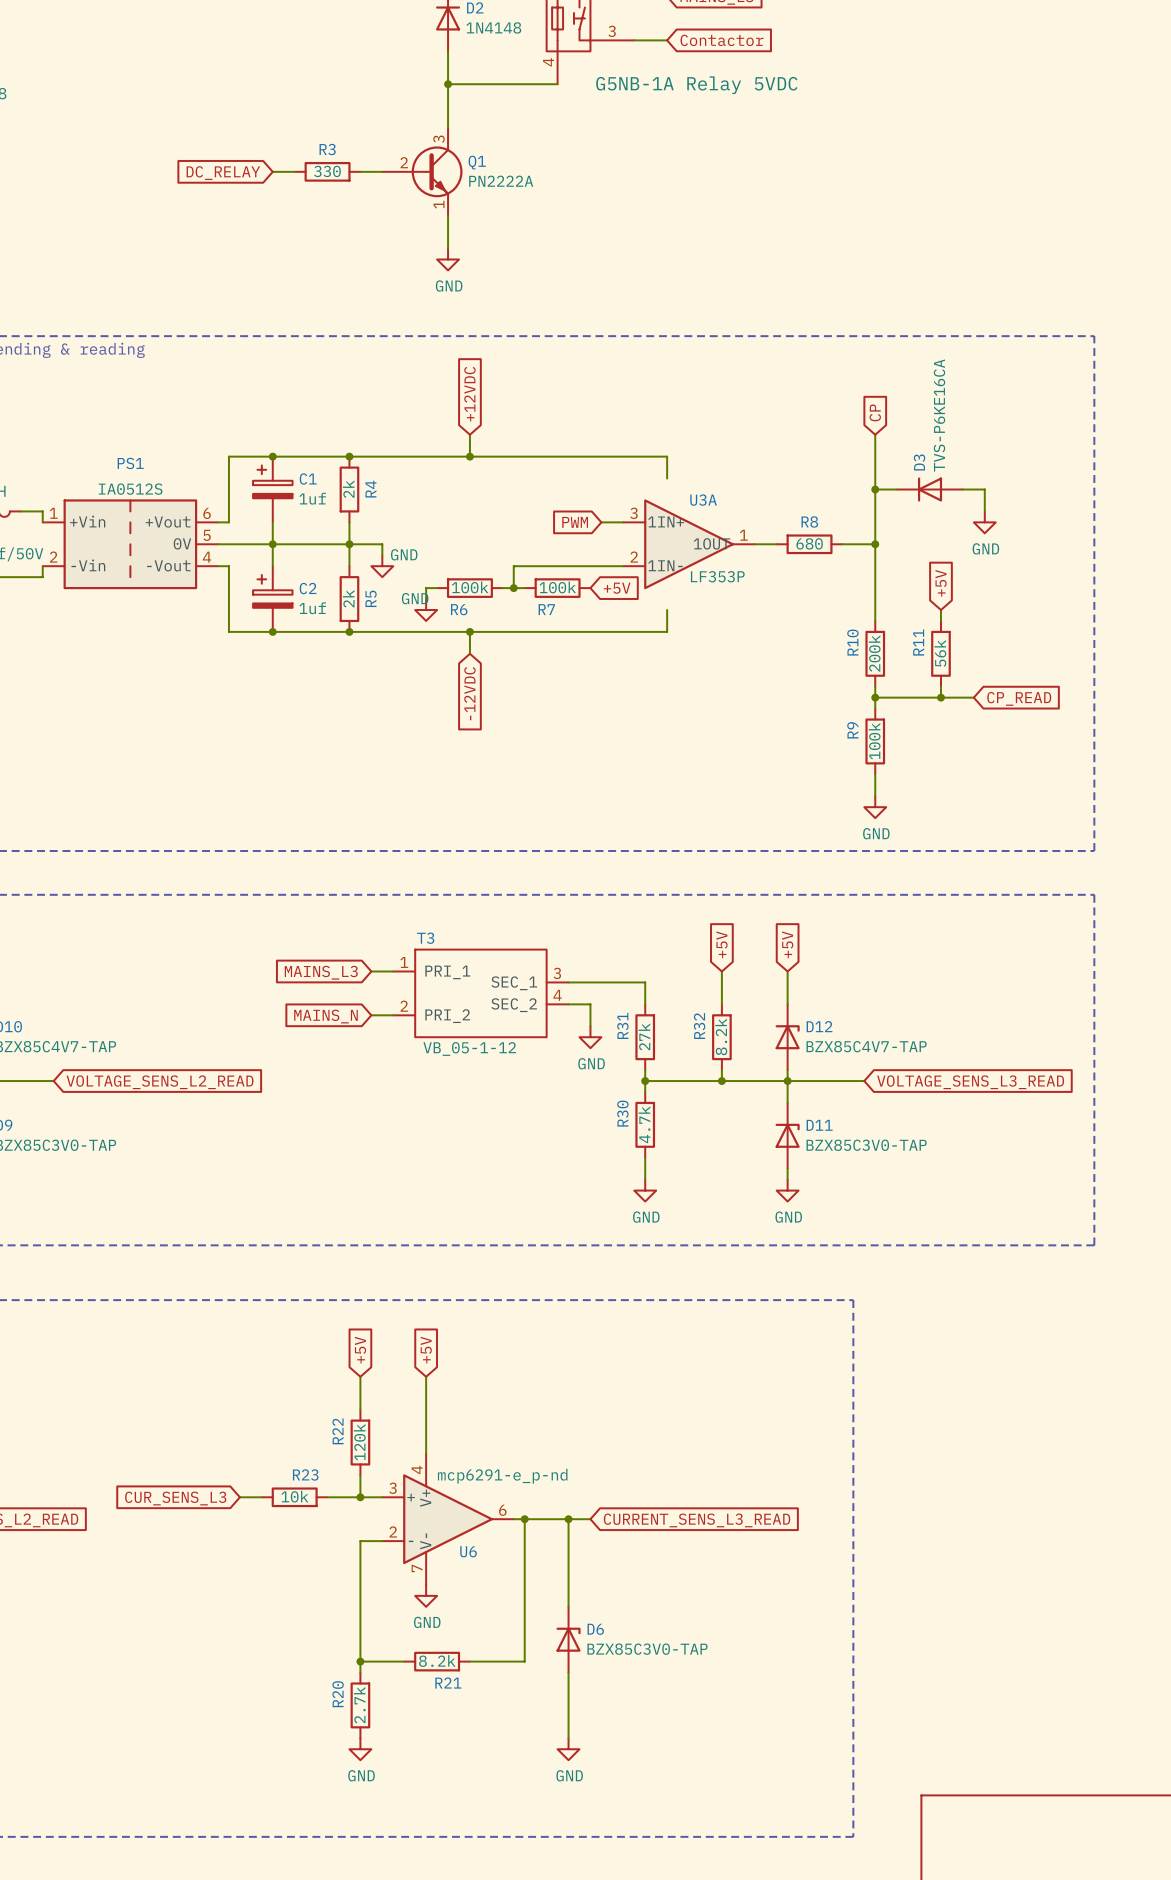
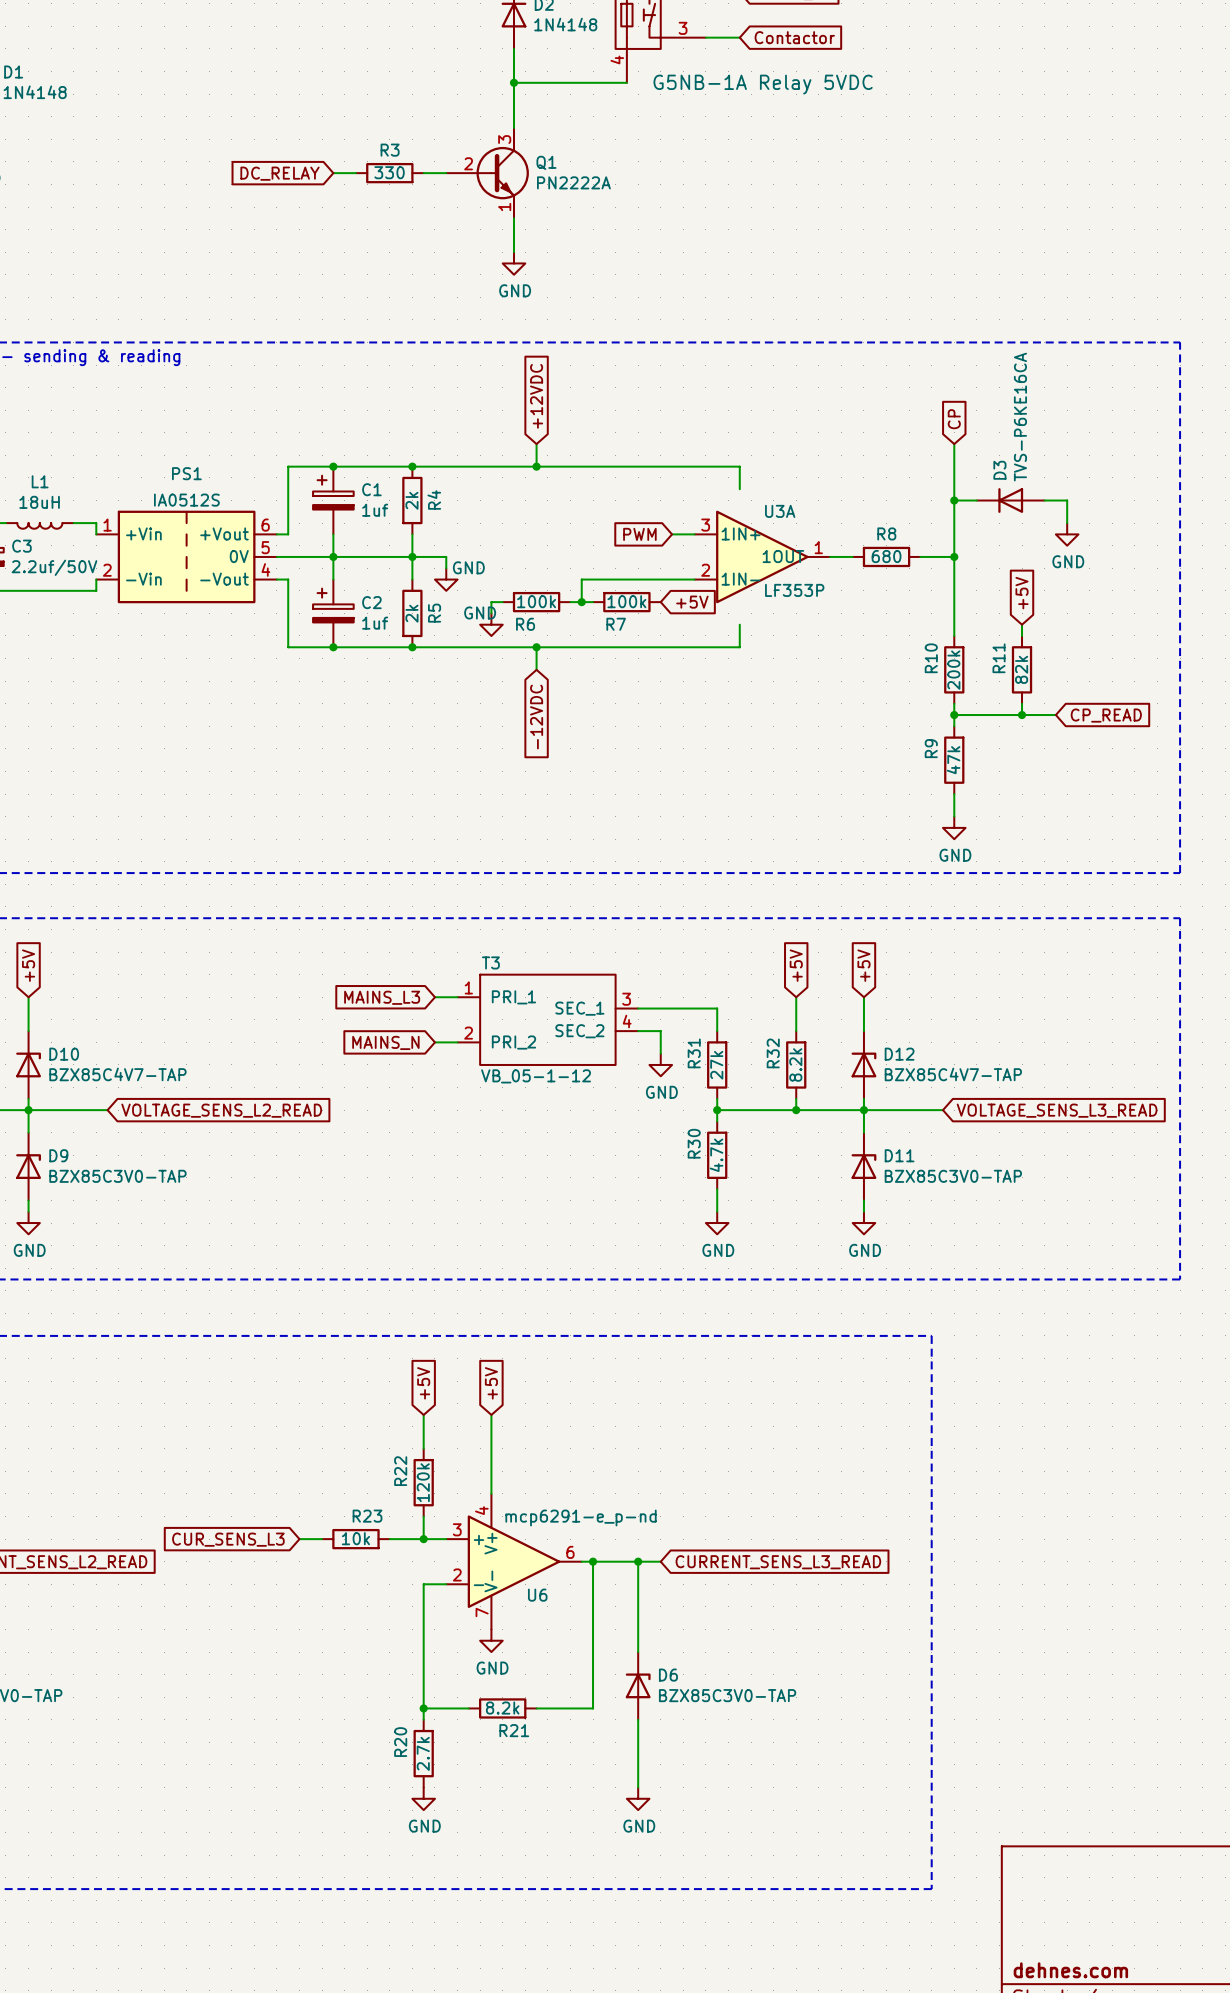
R11 value: 56k (940, 653) -> 82k (1021, 669)
R9 value: 100k (874, 741) -> 47k (953, 760)

